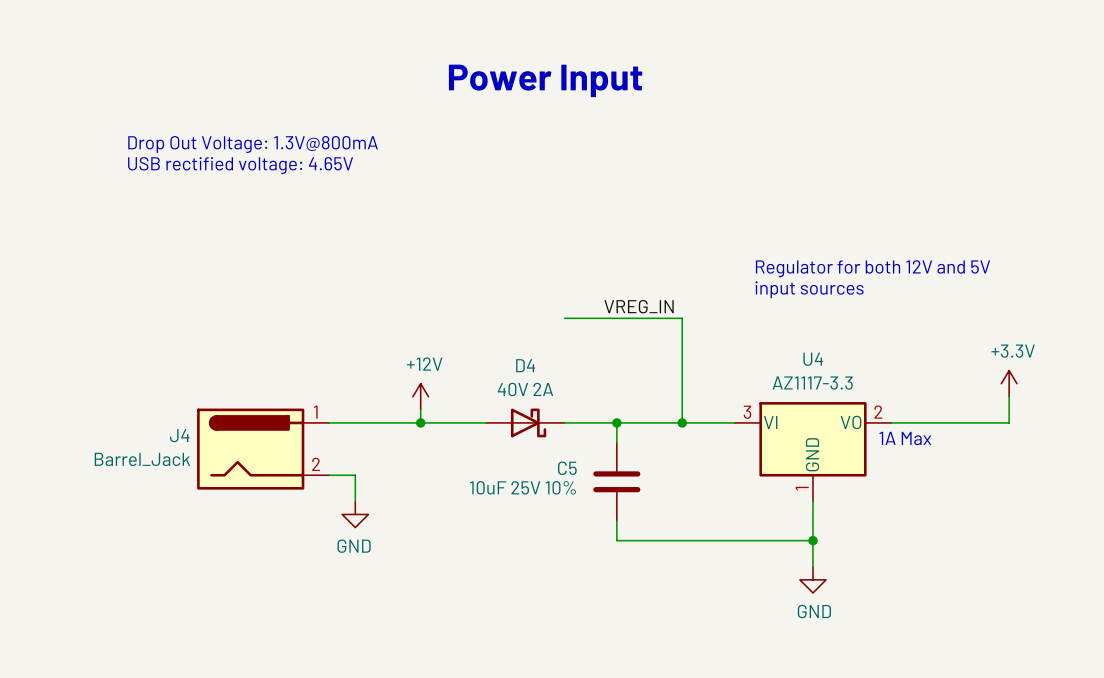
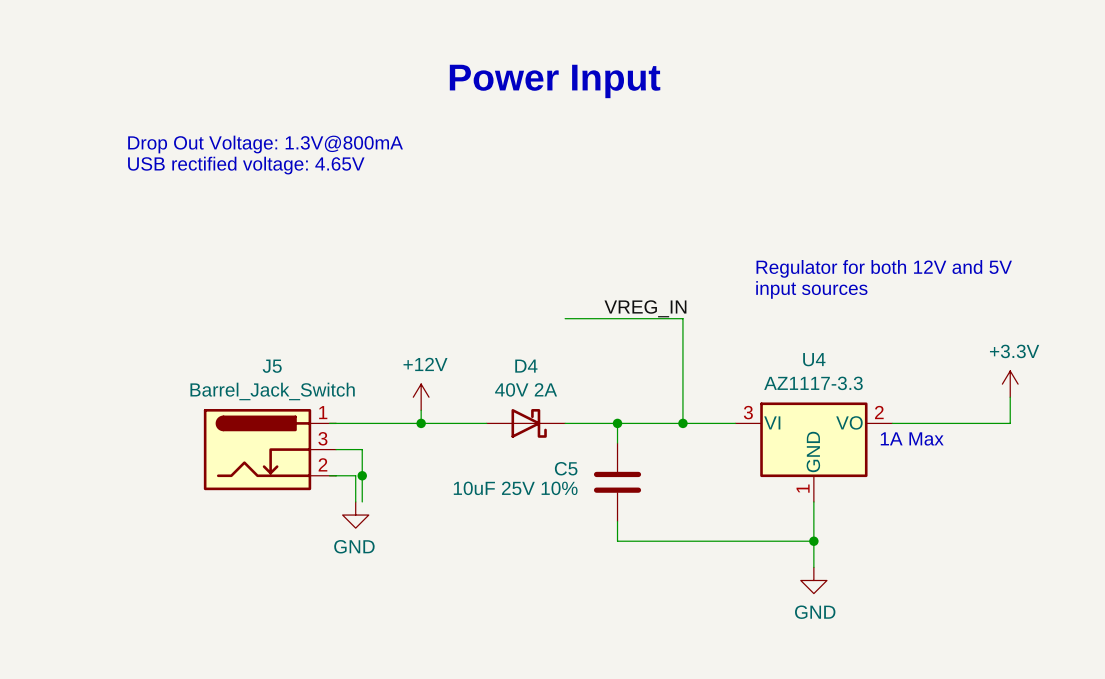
J4: Barrel_Jack (263, 449) -> none
J5: none -> Barrel_Jack_Switch (269, 449)
wire: none -> (336, 449) (362, 449) (362, 501)
junction: none -> (362, 475)

